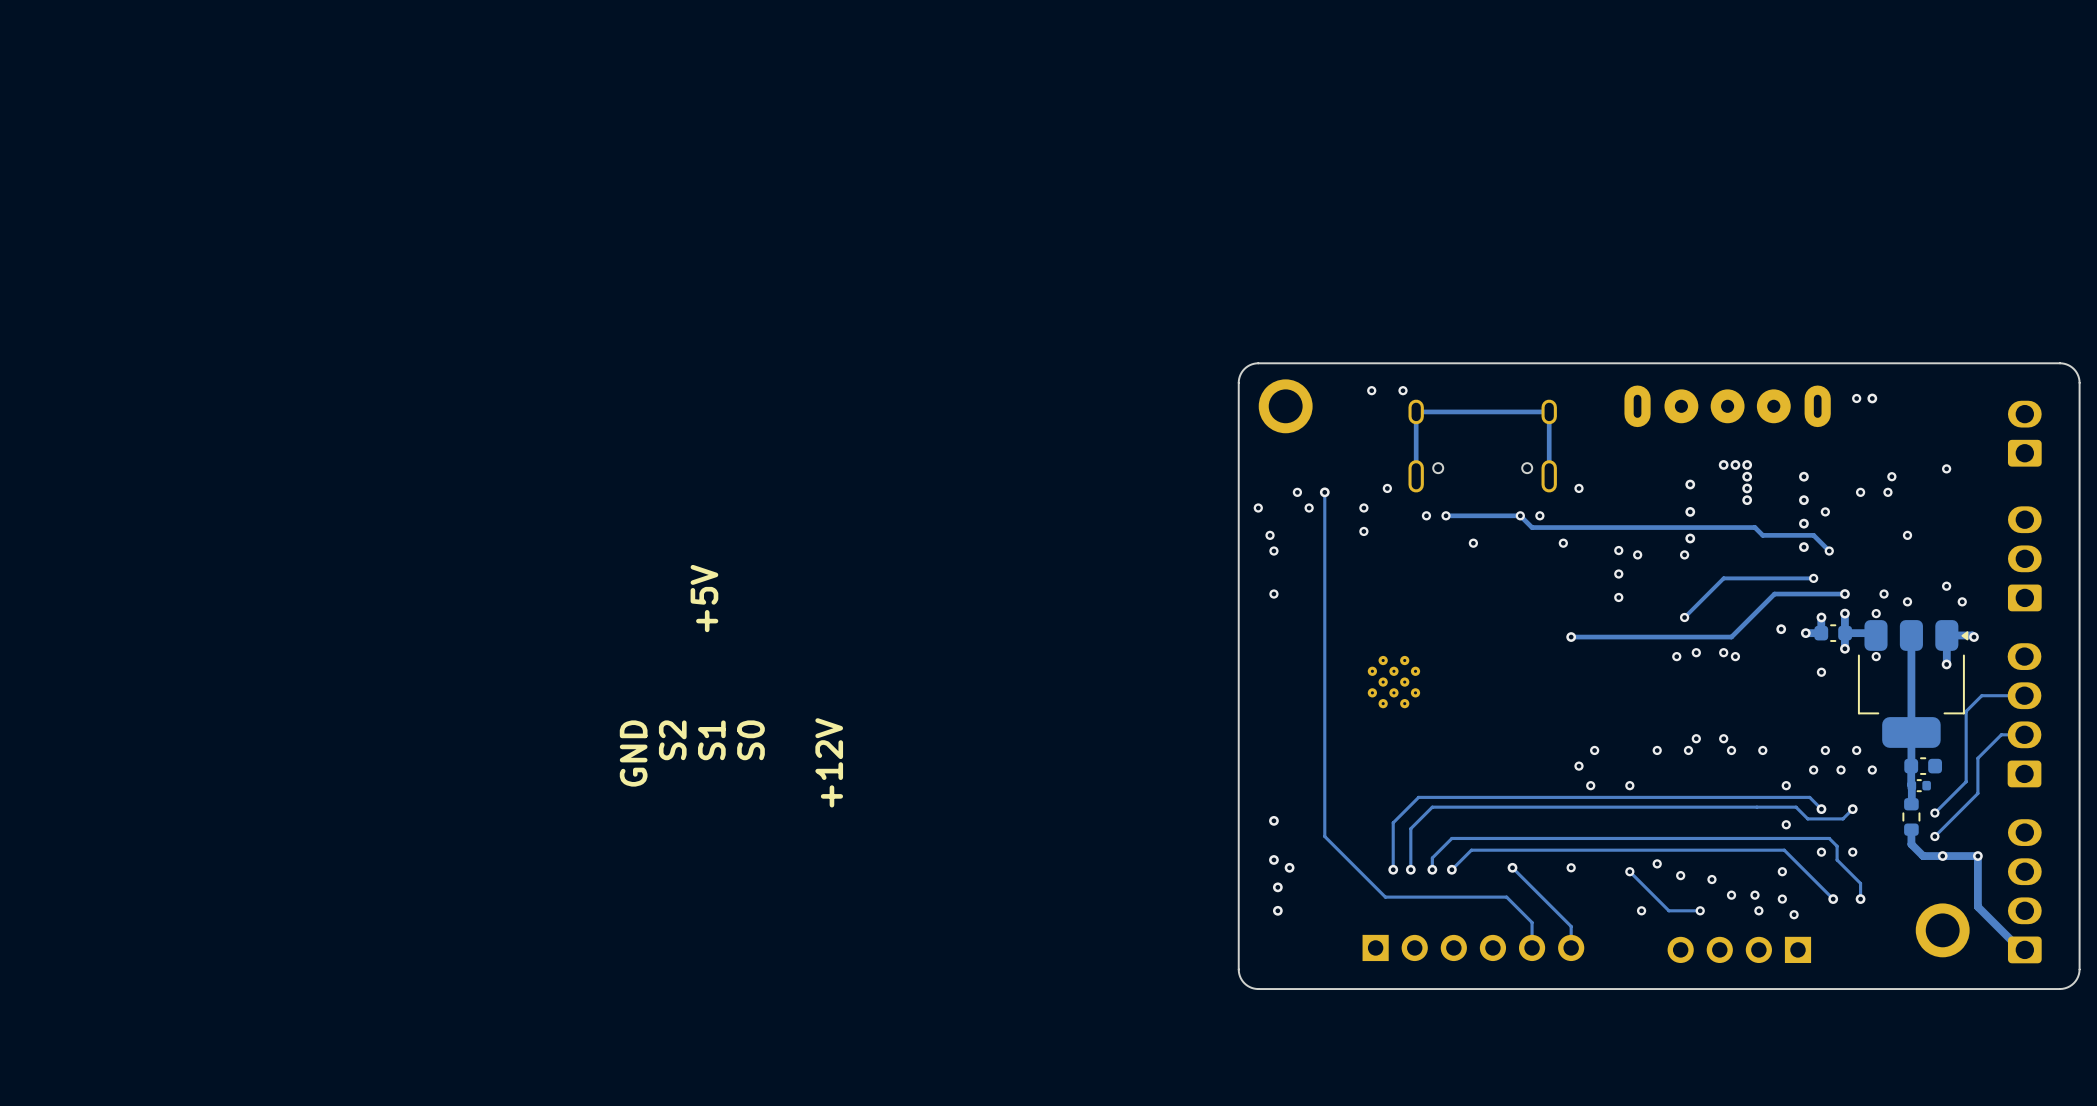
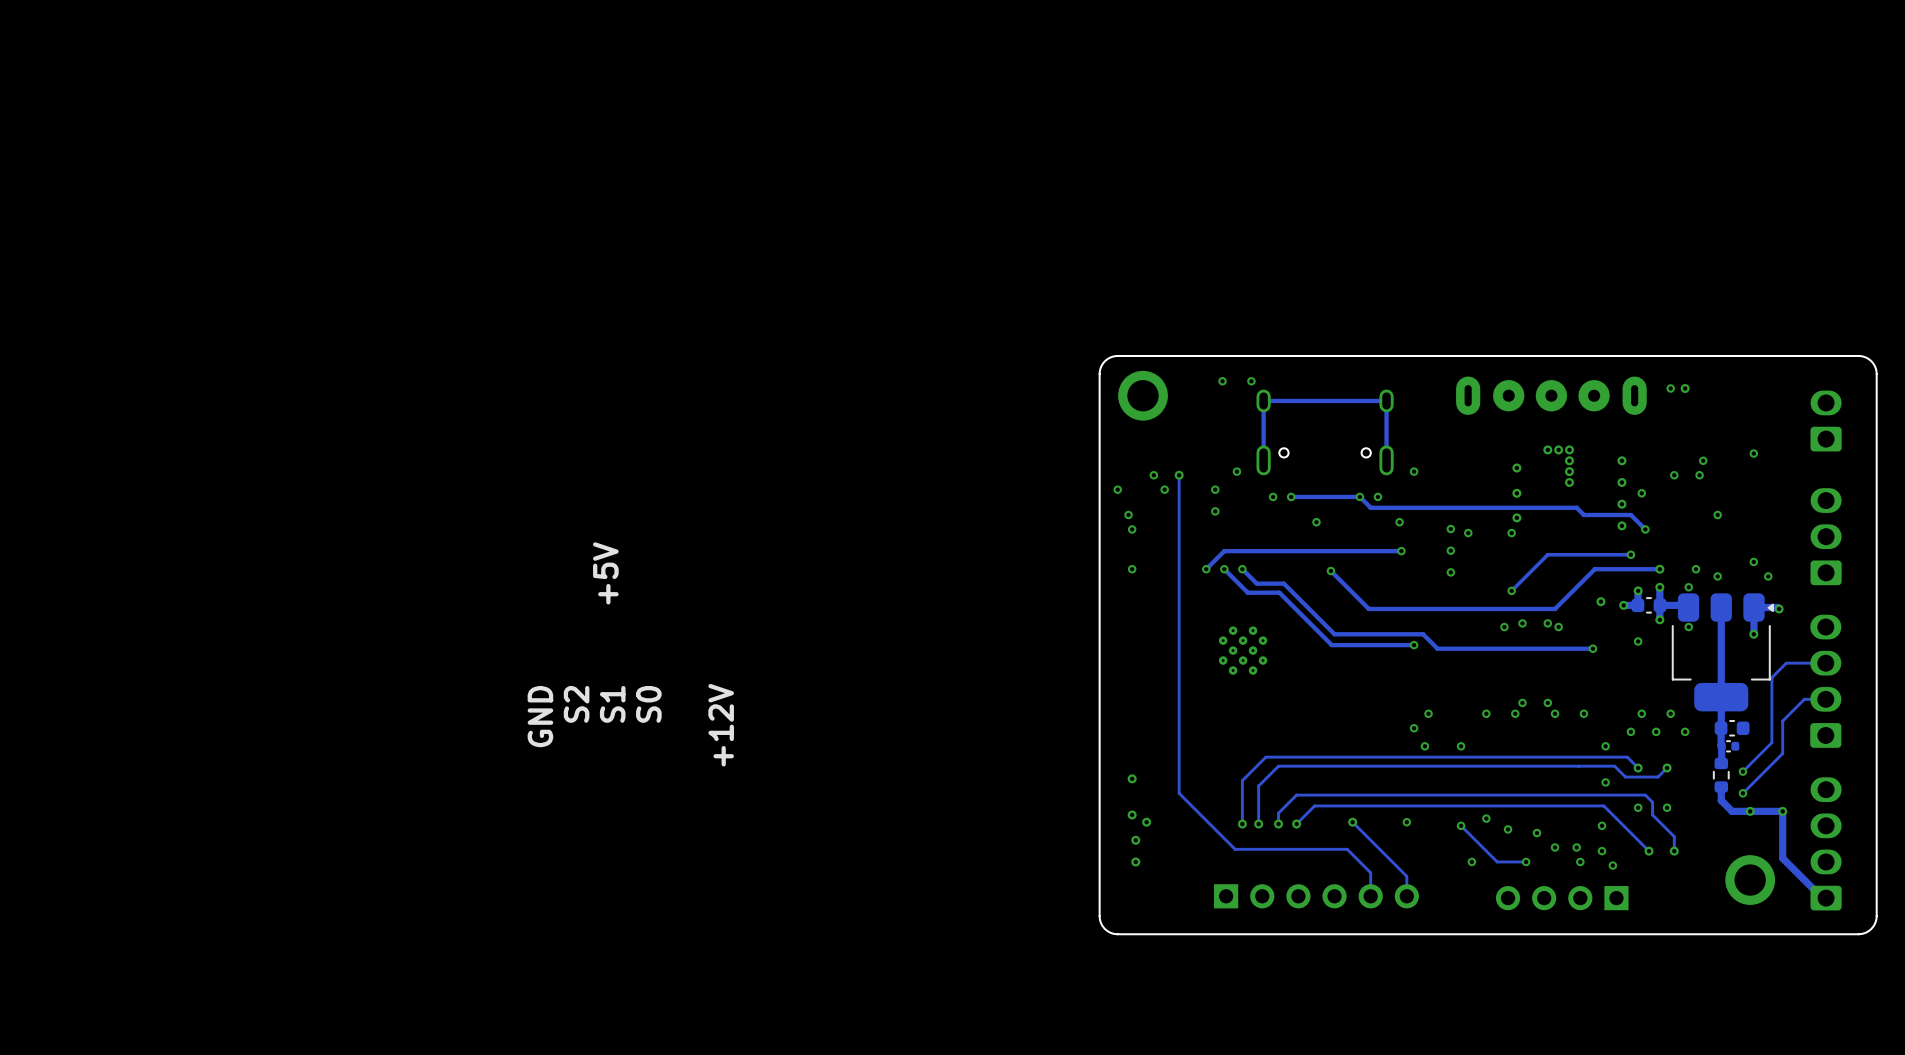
track: none -> (1401, 551) (1224, 551) (1206, 569)
via: none -> (1401, 551)
via: none -> (1206, 569)
track: none -> (1224, 569) (1247, 592) (1279, 592) (1331, 645) (1414, 645)
via: none -> (1224, 569)
track: none -> (1242, 569) (1256, 583) (1283, 583) (1334, 634) (1423, 634) (1437, 648) (1592, 648)
via: none -> (1242, 569)
track: none -> (1330, 571) (1368, 608) (1406, 608)
via: none -> (1330, 571)
via: (1571, 637) -> none
via: none -> (1414, 645)
via: none -> (1592, 648)

